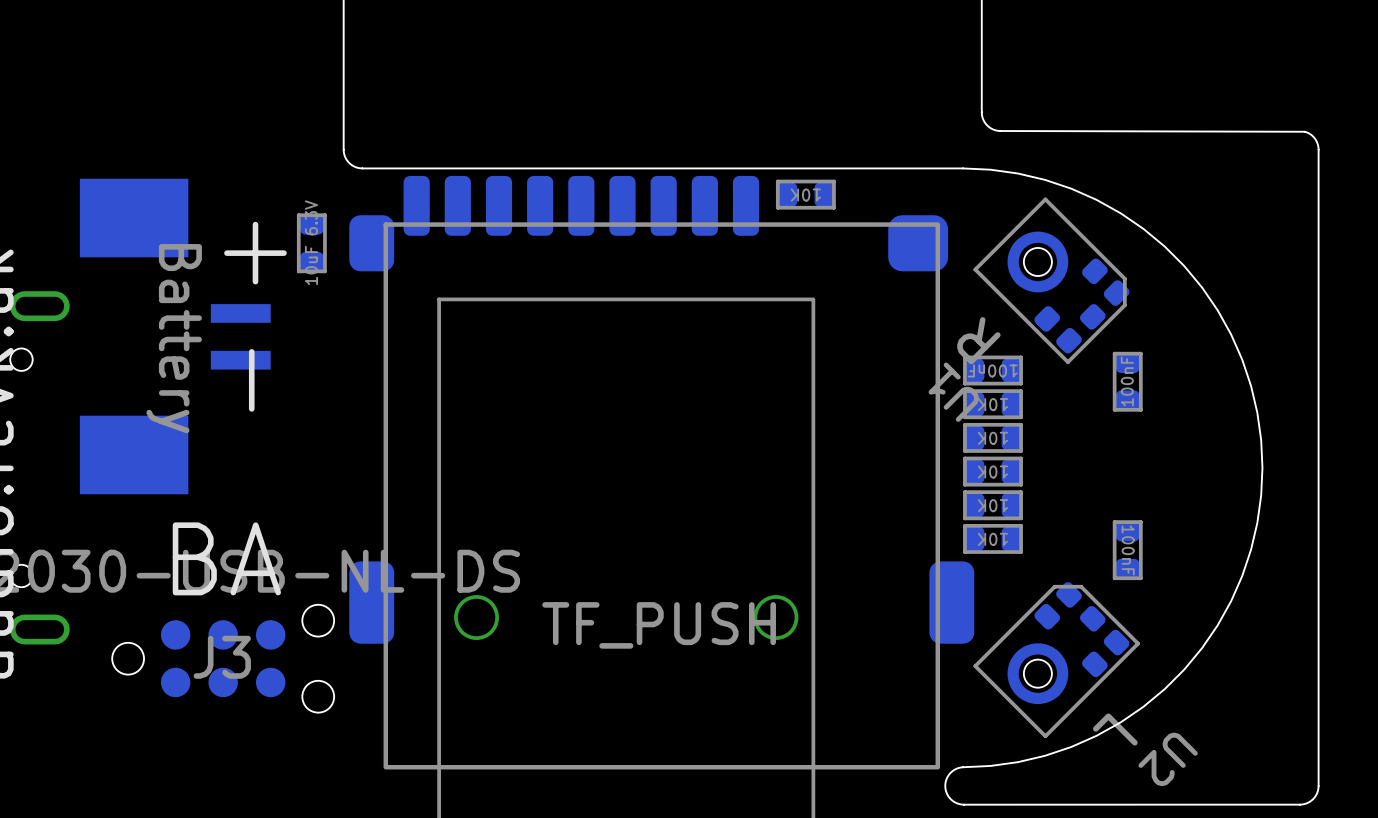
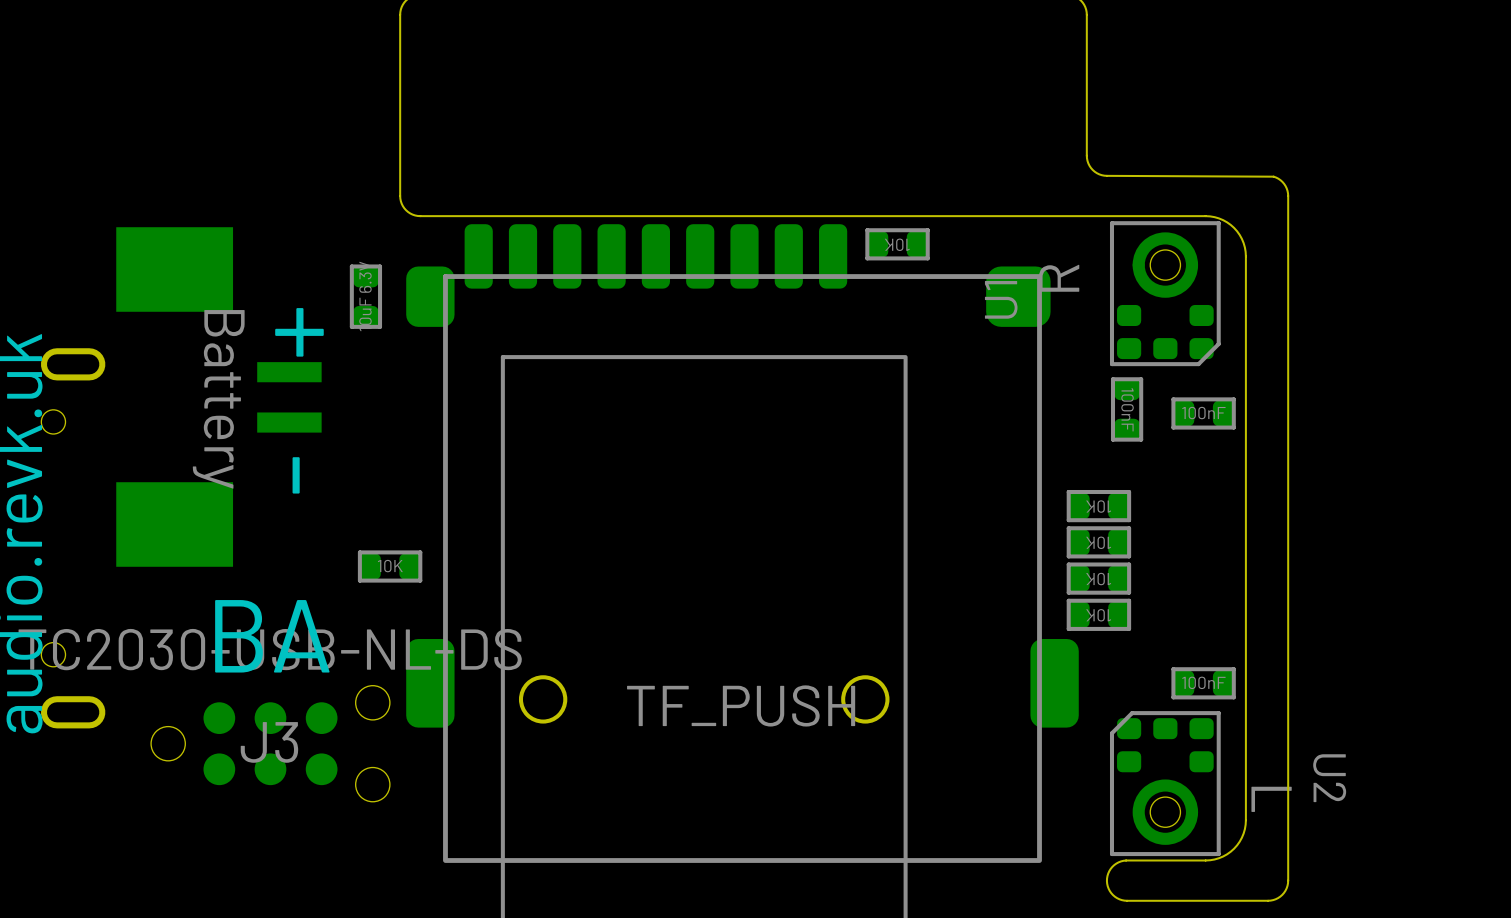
board edge: (1000, 131) (1305, 131) (1313, 136) (1317, 142) (1318, 785) (1316, 795) (1309, 802) (1299, 804) (964, 804) (954, 802) (947, 795) (945, 786) (946, 779) (956, 768) (1018, 762) (1071, 747) (1120, 722) (1143, 706) (1184, 669) (1217, 625) (1242, 575) (1257, 522) (1262, 467) (1257, 412) (1242, 359) (1217, 310) (1184, 266) (1143, 228) (1096, 199) (1045, 179) (990, 169) (963, 168) -> (1106, 175) (1273, 176) (1282, 181) (1287, 190) (1288, 880) (1284, 892) (1273, 900) (1124, 900) (1111, 893) (1106, 881) (1112, 866) (1123, 860) (1205, 860) (1218, 858) (1234, 848) (1239, 841) (1244, 829) (1245, 256) (1243, 243) (1239, 234) (1230, 224) (1218, 218) (1210, 216) (1066, 216)
U1 rotation: 0° (1051, 280) -> 45° clockwise (1165, 293)
part rotation: 0° (993, 370) -> 90° clockwise (1127, 409)
part rotation: 0° (1127, 381) -> 90° clockwise (1203, 413)
part position: (1127, 381) -> (1203, 413)
part position: (993, 404) -> (390, 566)
part value rotation: 0° (993, 404) -> 180° (390, 566)
part rotation: 0° (1127, 550) -> 90° clockwise (1203, 683)
part position: (1127, 550) -> (1203, 683)
U2 rotation: 0° (1056, 660) -> 45° counterclockwise (1165, 783)

